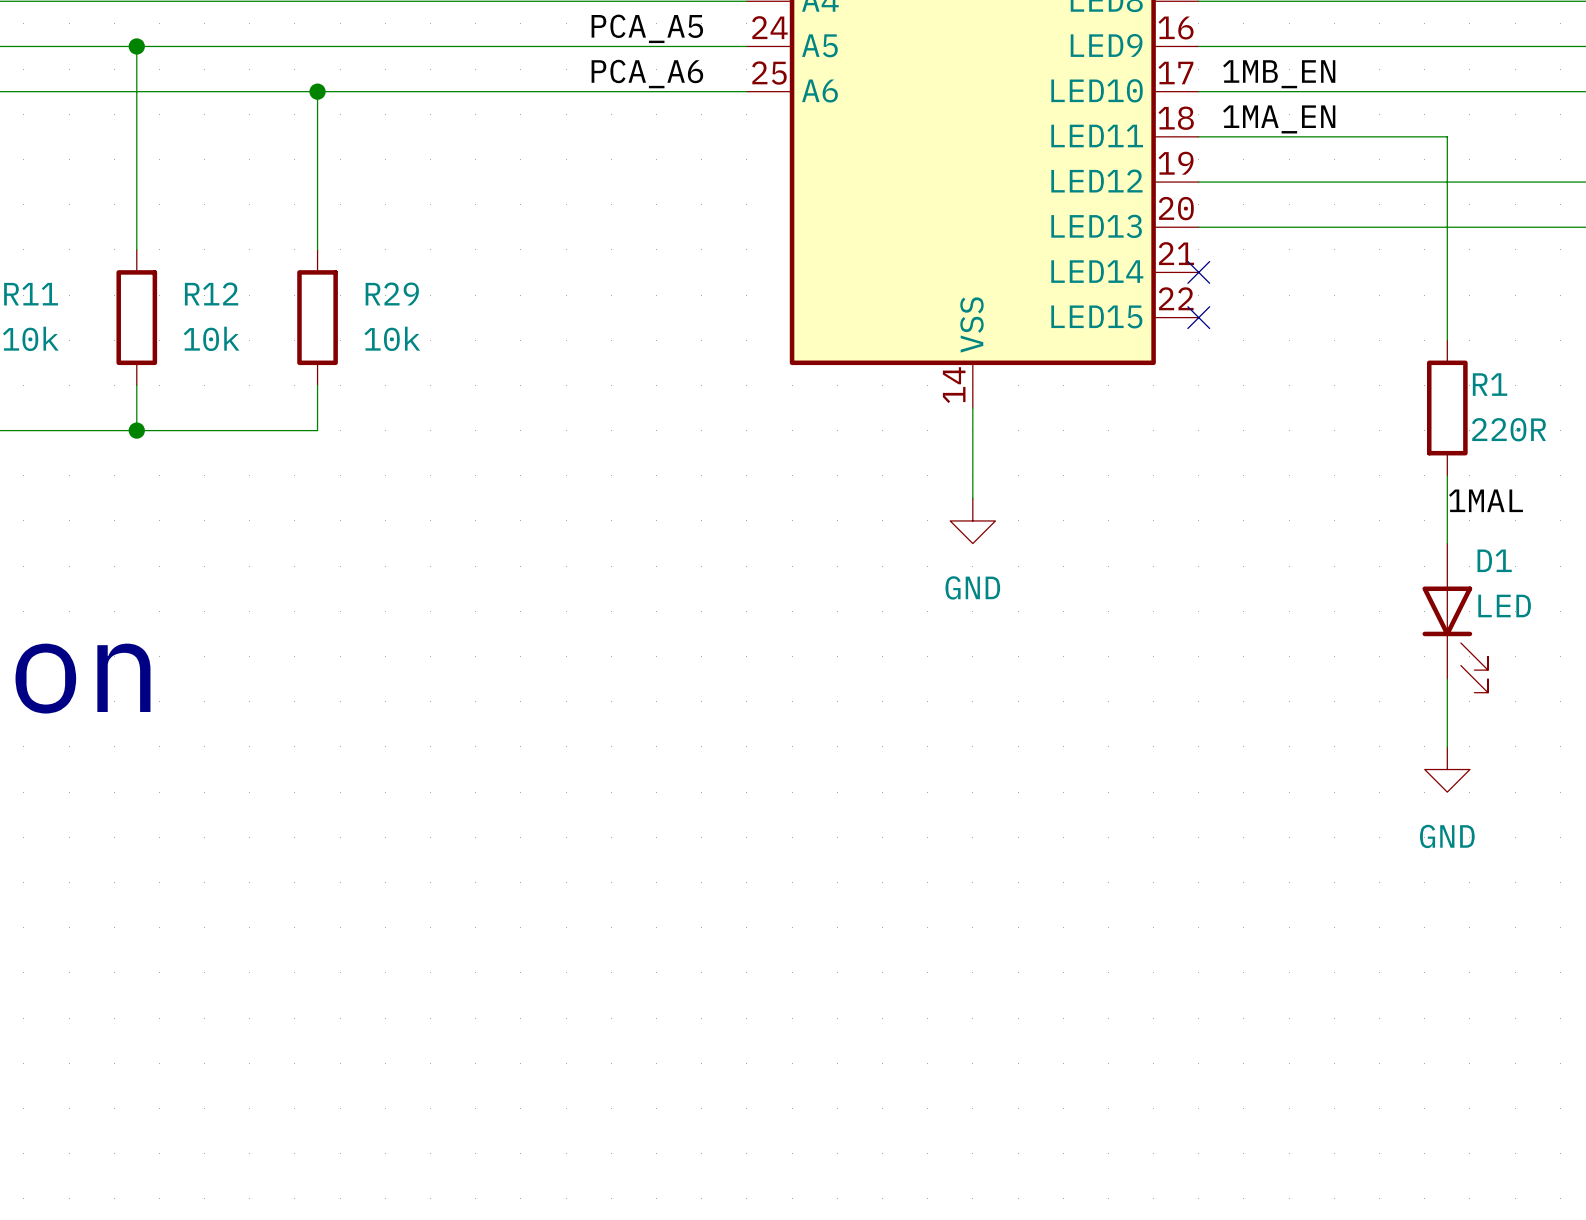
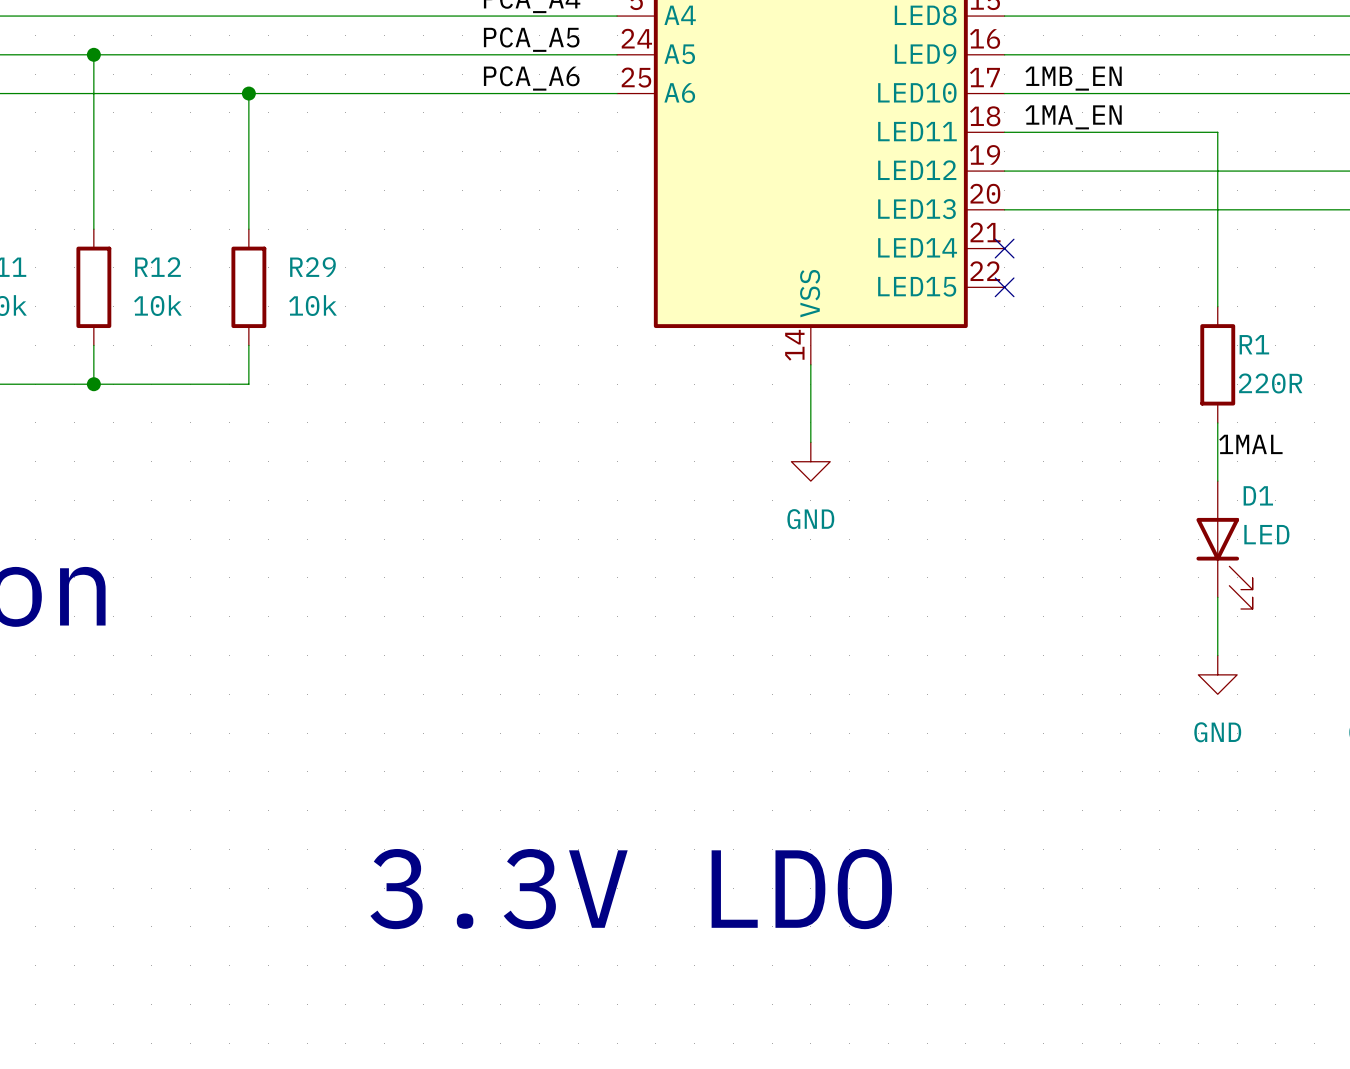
text: none -> 3.3V LDO (631, 889)

